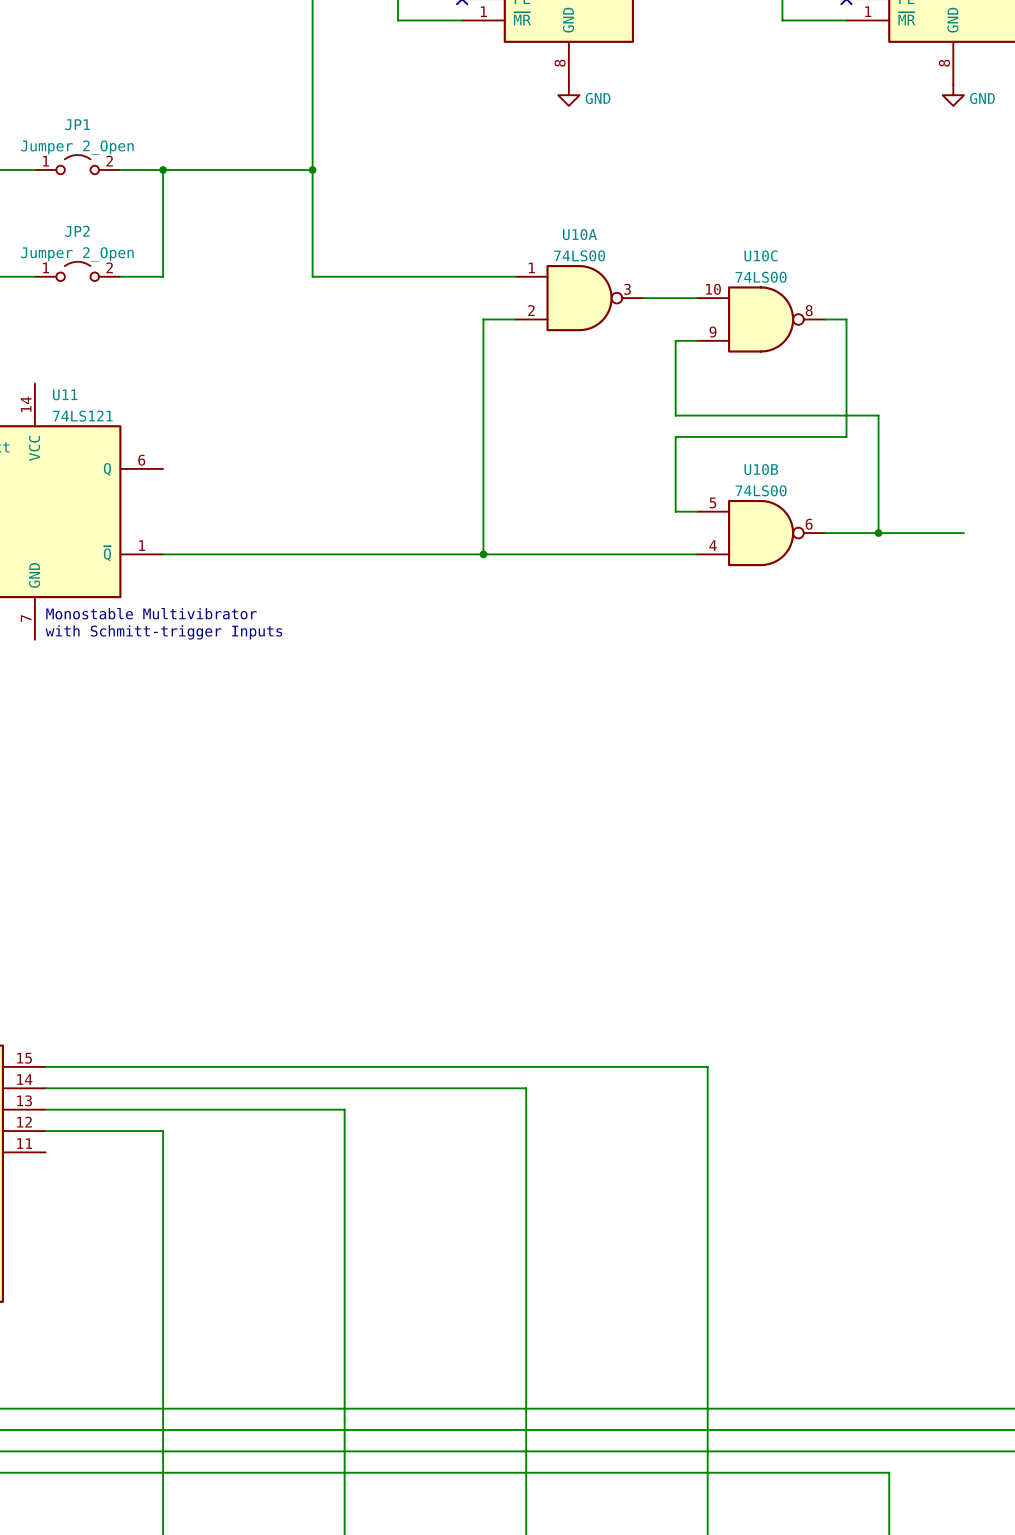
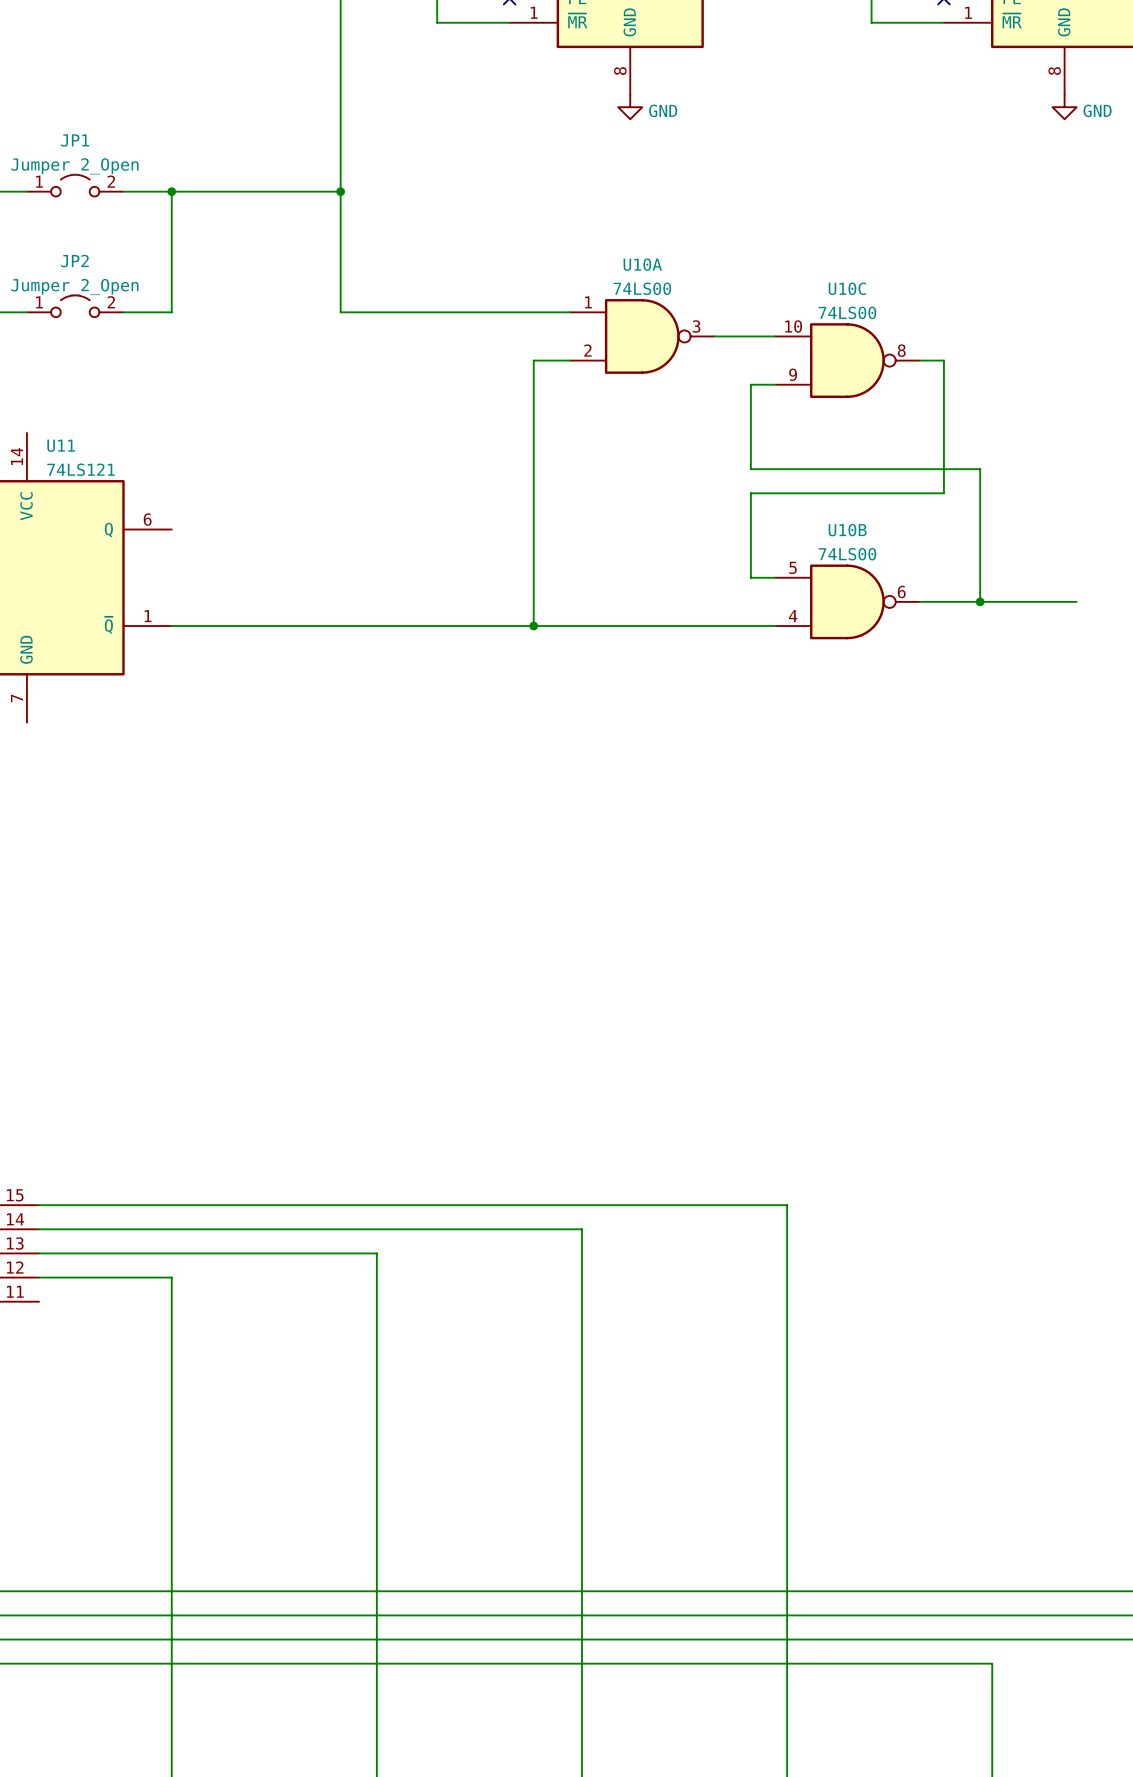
text: Monostable Multivibrator (151, 613) -> none
text: with Schmitt-trigger Inputs (163, 632) -> none

